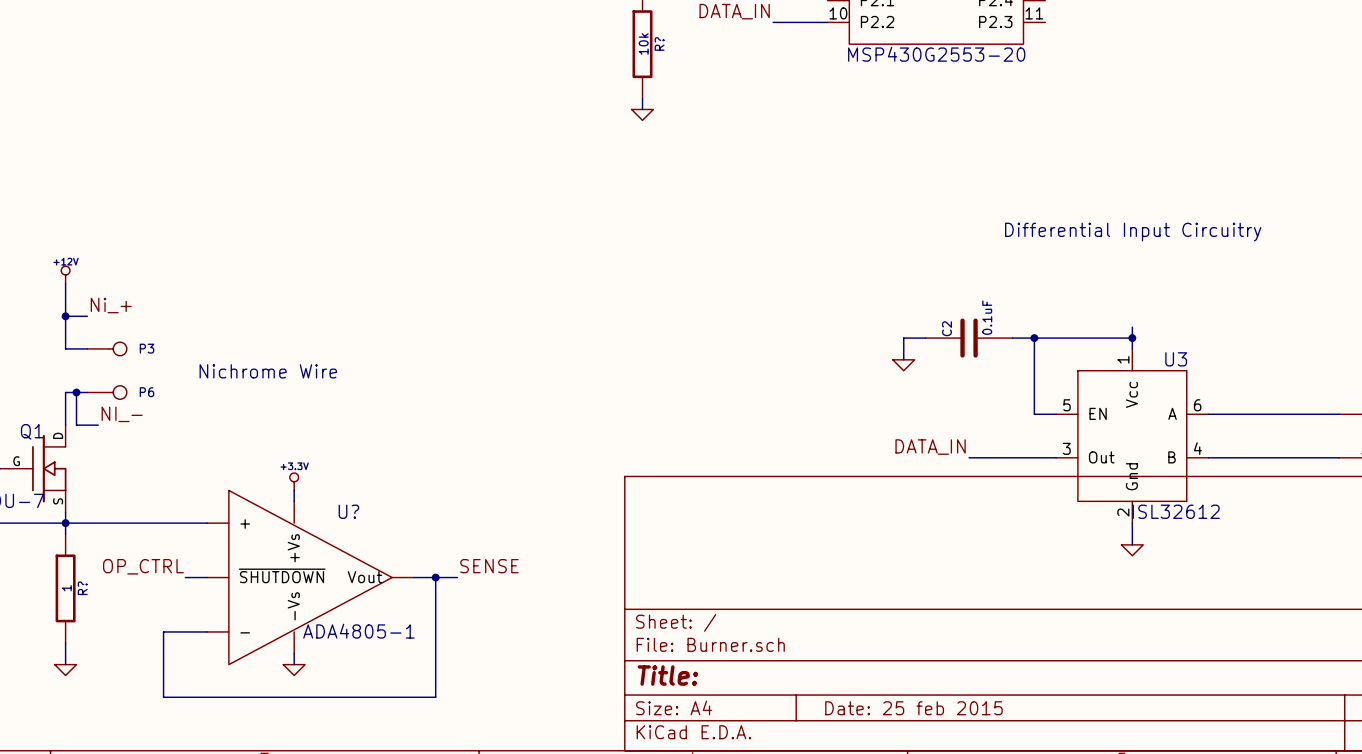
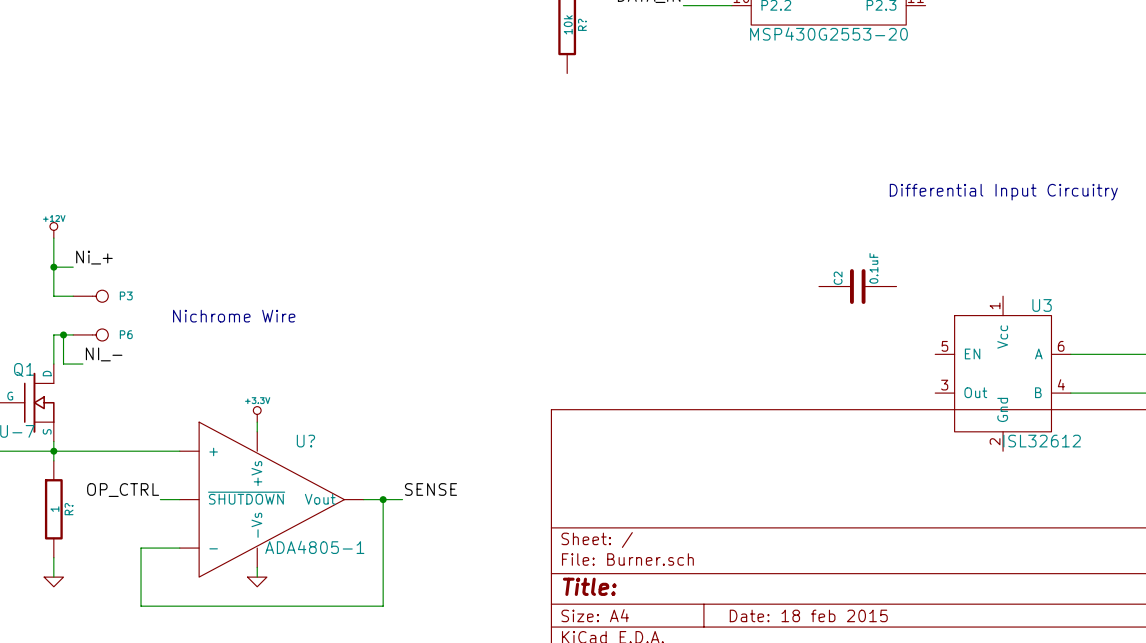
wire: (642, 98) (642, 109) -> none
power symbol: (642, 114) -> none
wire: (1132, 327) (1132, 348) -> none
wire: (925, 338) (903, 338) (903, 359) -> none
wire: (1012, 338) (1132, 338) -> none
wire: (1034, 338) (1034, 414) (1056, 414) -> none
junction: (1034, 338) -> none
junction: (1132, 338) -> none
power symbol: (903, 365) -> none
label: DATA_IN (930, 447) -> none
wire: (969, 457) (1056, 457) -> none
wire: (1132, 523) (1132, 544) -> none
power symbol: (1132, 550) -> none
title block: Date: 25 feb 2015 (913, 708) -> Date: 18 feb 2015 (808, 615)

